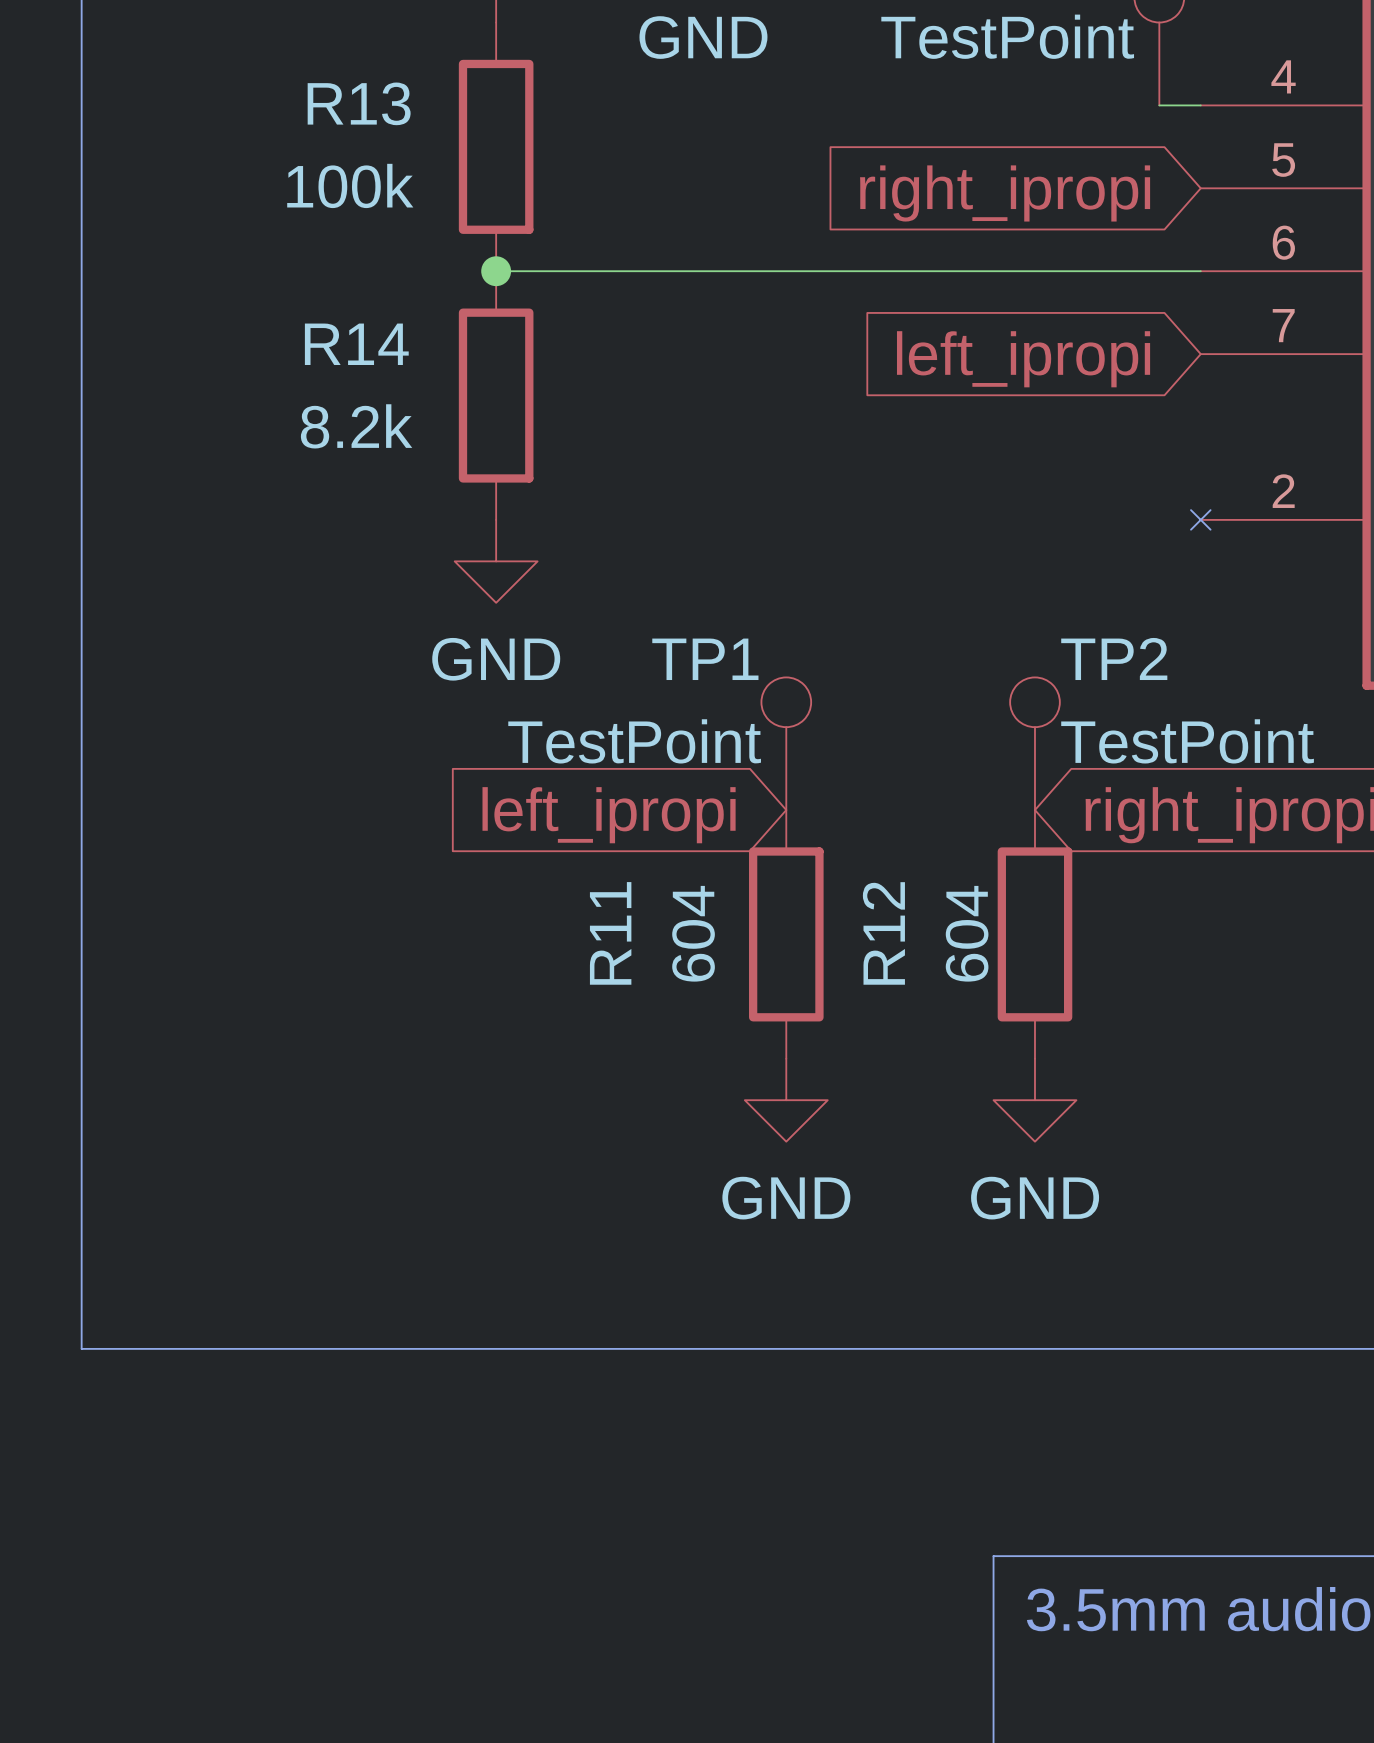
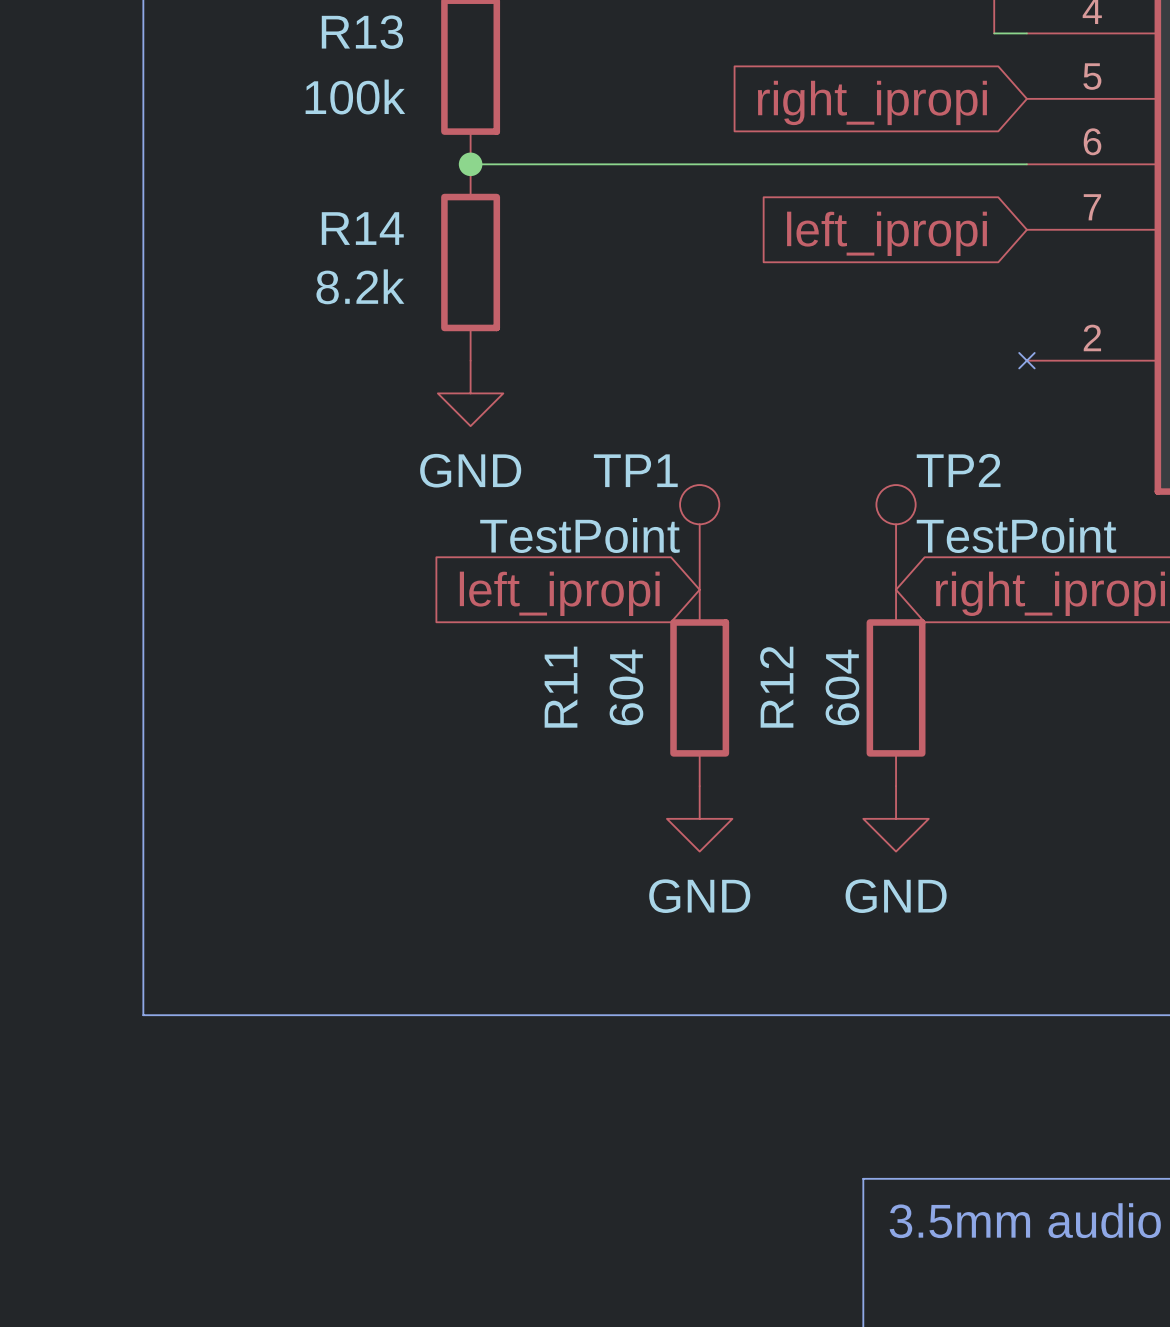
R14 name position: R14 (356, 344) -> R14 (362, 228)

